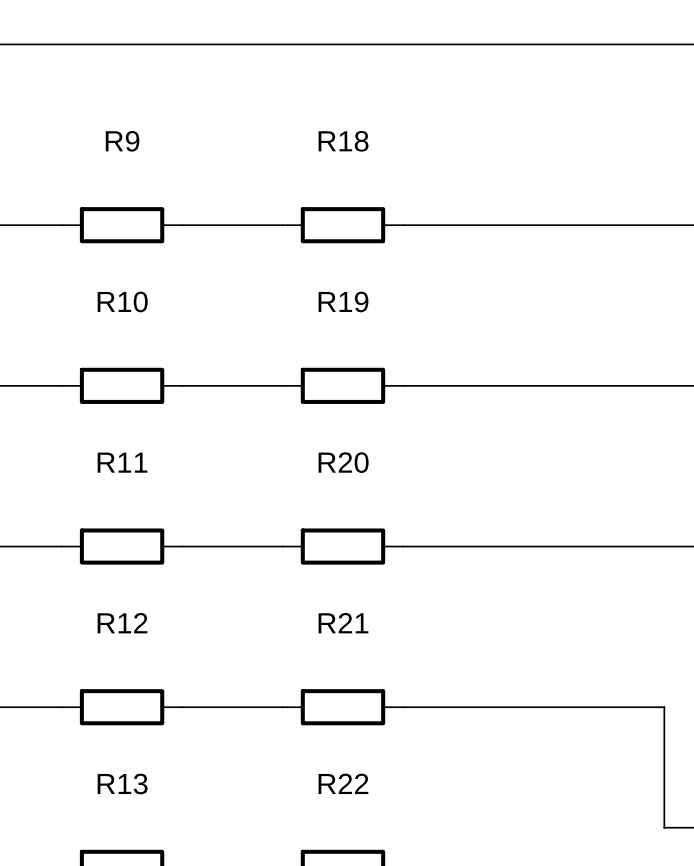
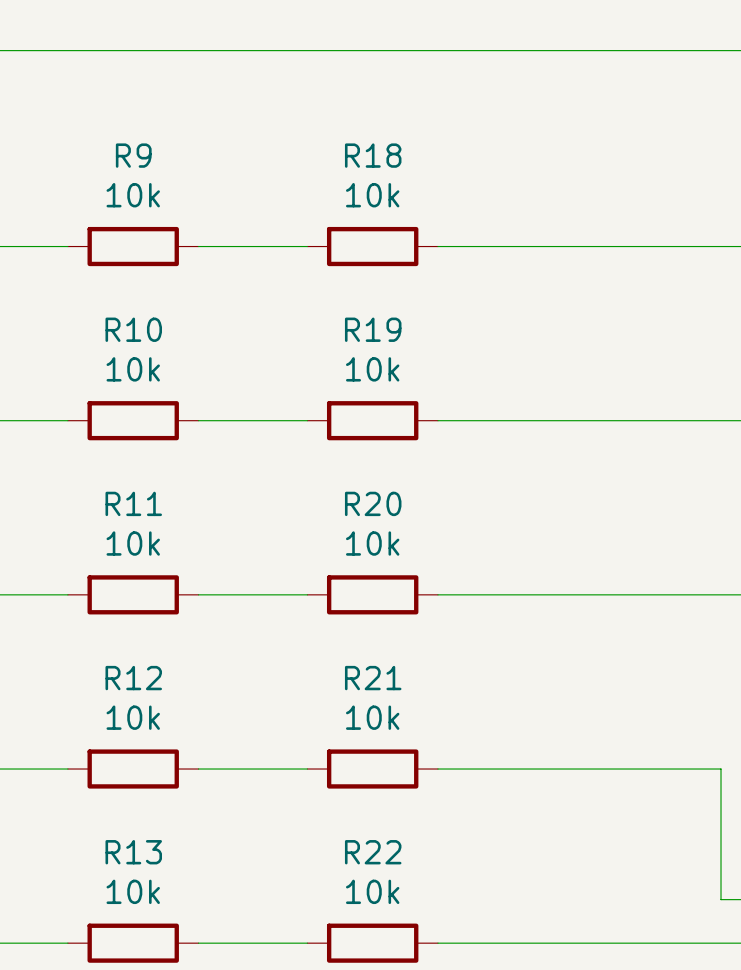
R9 value: none -> 10k (133, 195)
R18 value: none -> 10k (372, 195)
R10 value: none -> 10k (133, 369)
R19 value: none -> 10k (372, 369)
R11 value: none -> 10k (133, 543)
R20 value: none -> 10k (372, 543)
R12 value: none -> 10k (133, 717)
R21 value: none -> 10k (372, 717)
R13 value: none -> 10k (133, 891)
R22 value: none -> 10k (372, 891)

